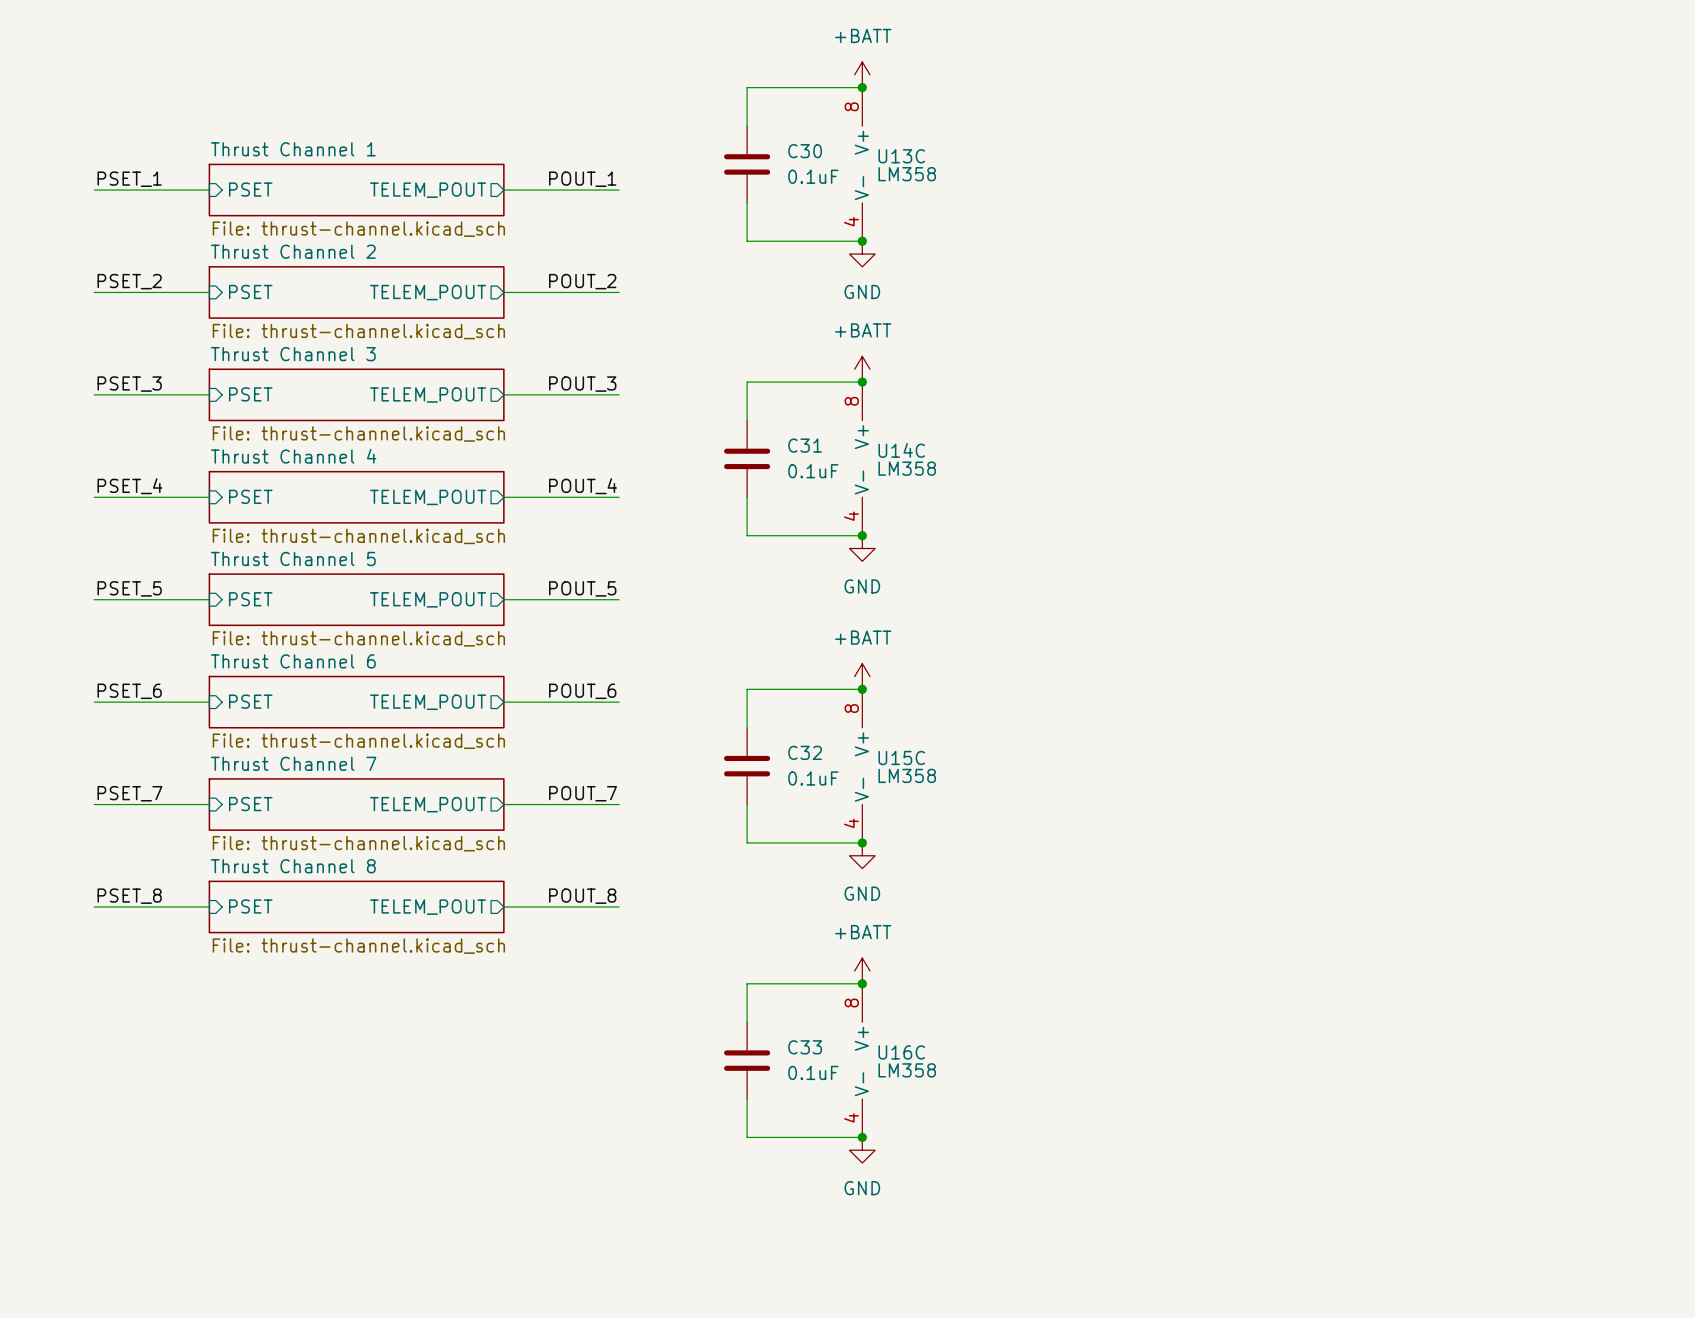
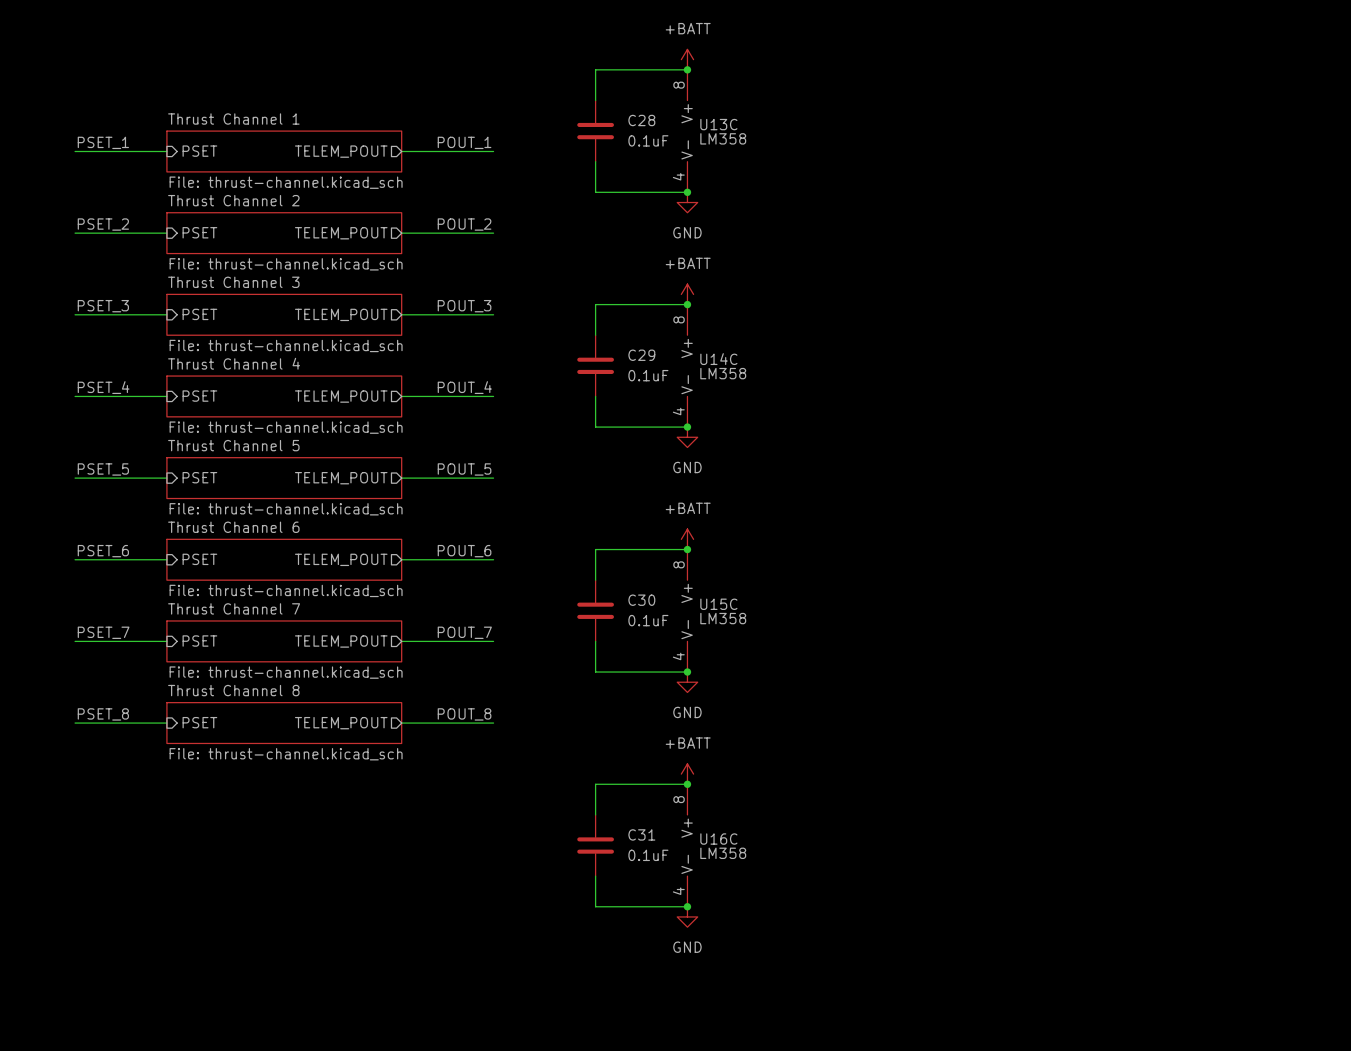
C30 name: C30 (805, 151) -> C28 (641, 120)
C31 name: C31 (805, 445) -> C29 (641, 355)
C32 name: C32 (805, 752) -> C30 (641, 600)
C33 name: C33 (805, 1047) -> C31 (641, 834)

